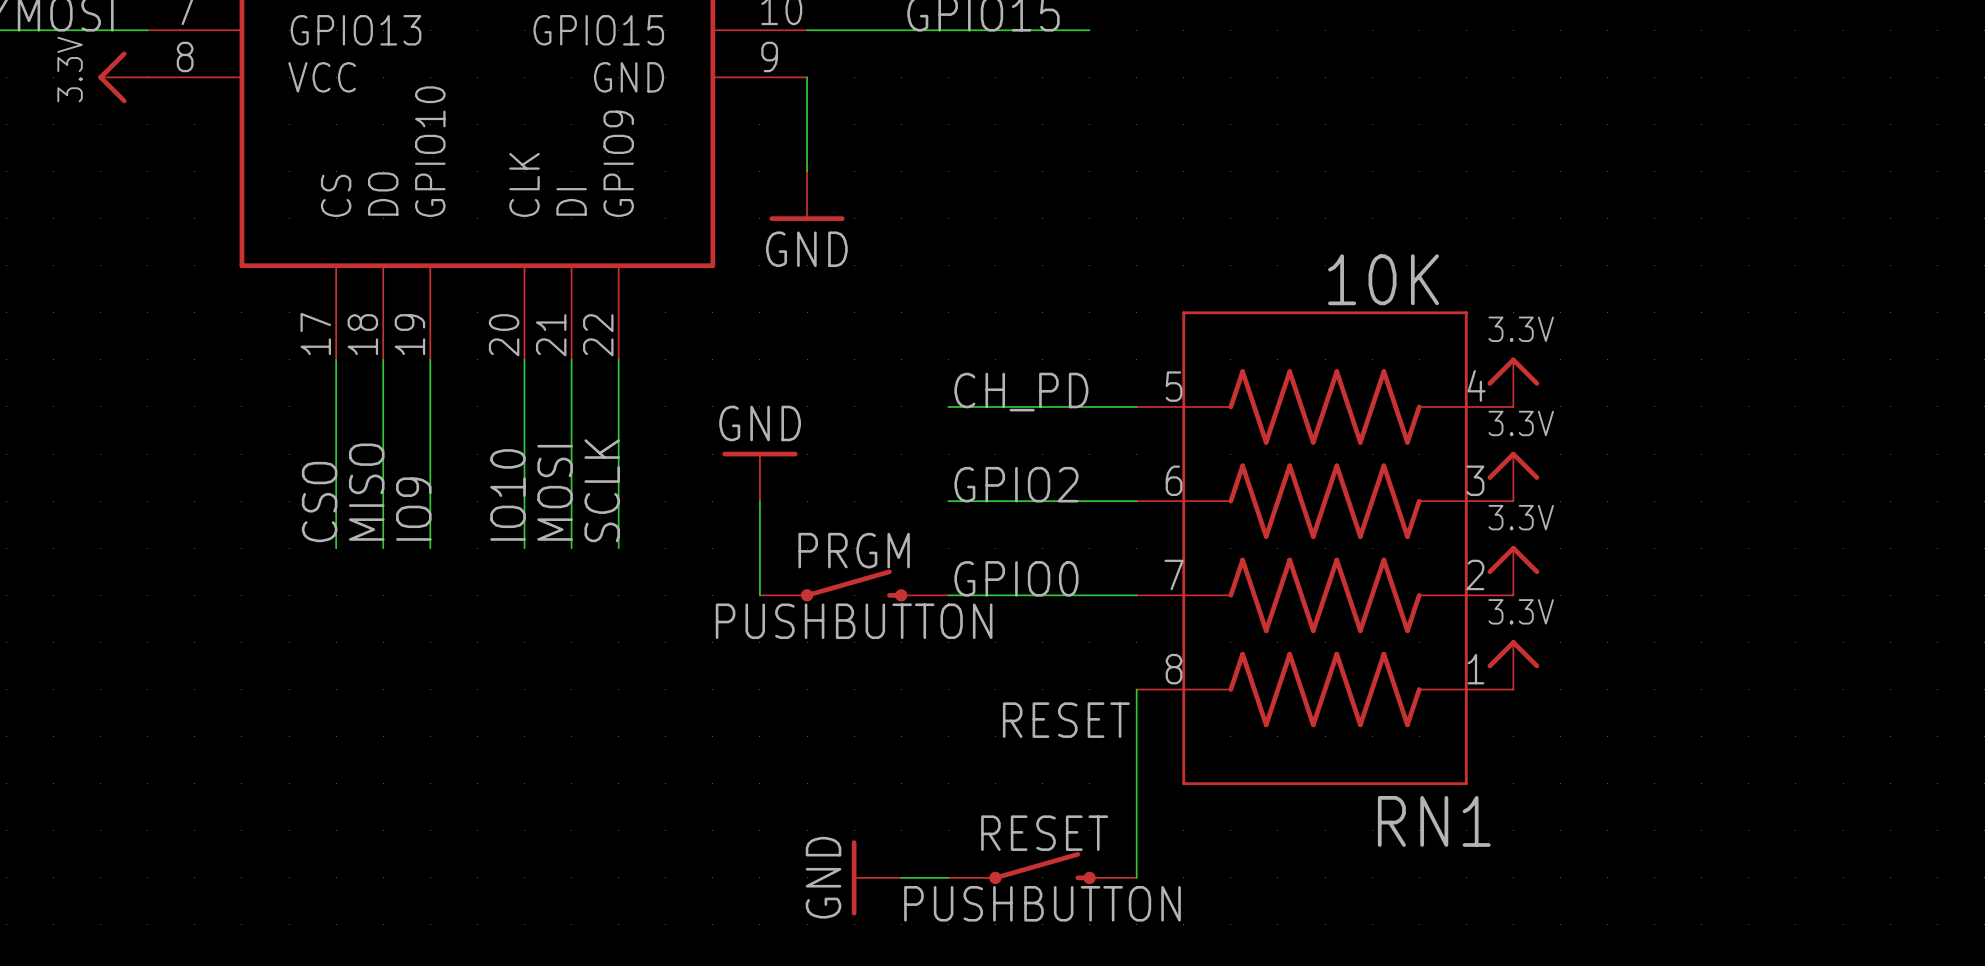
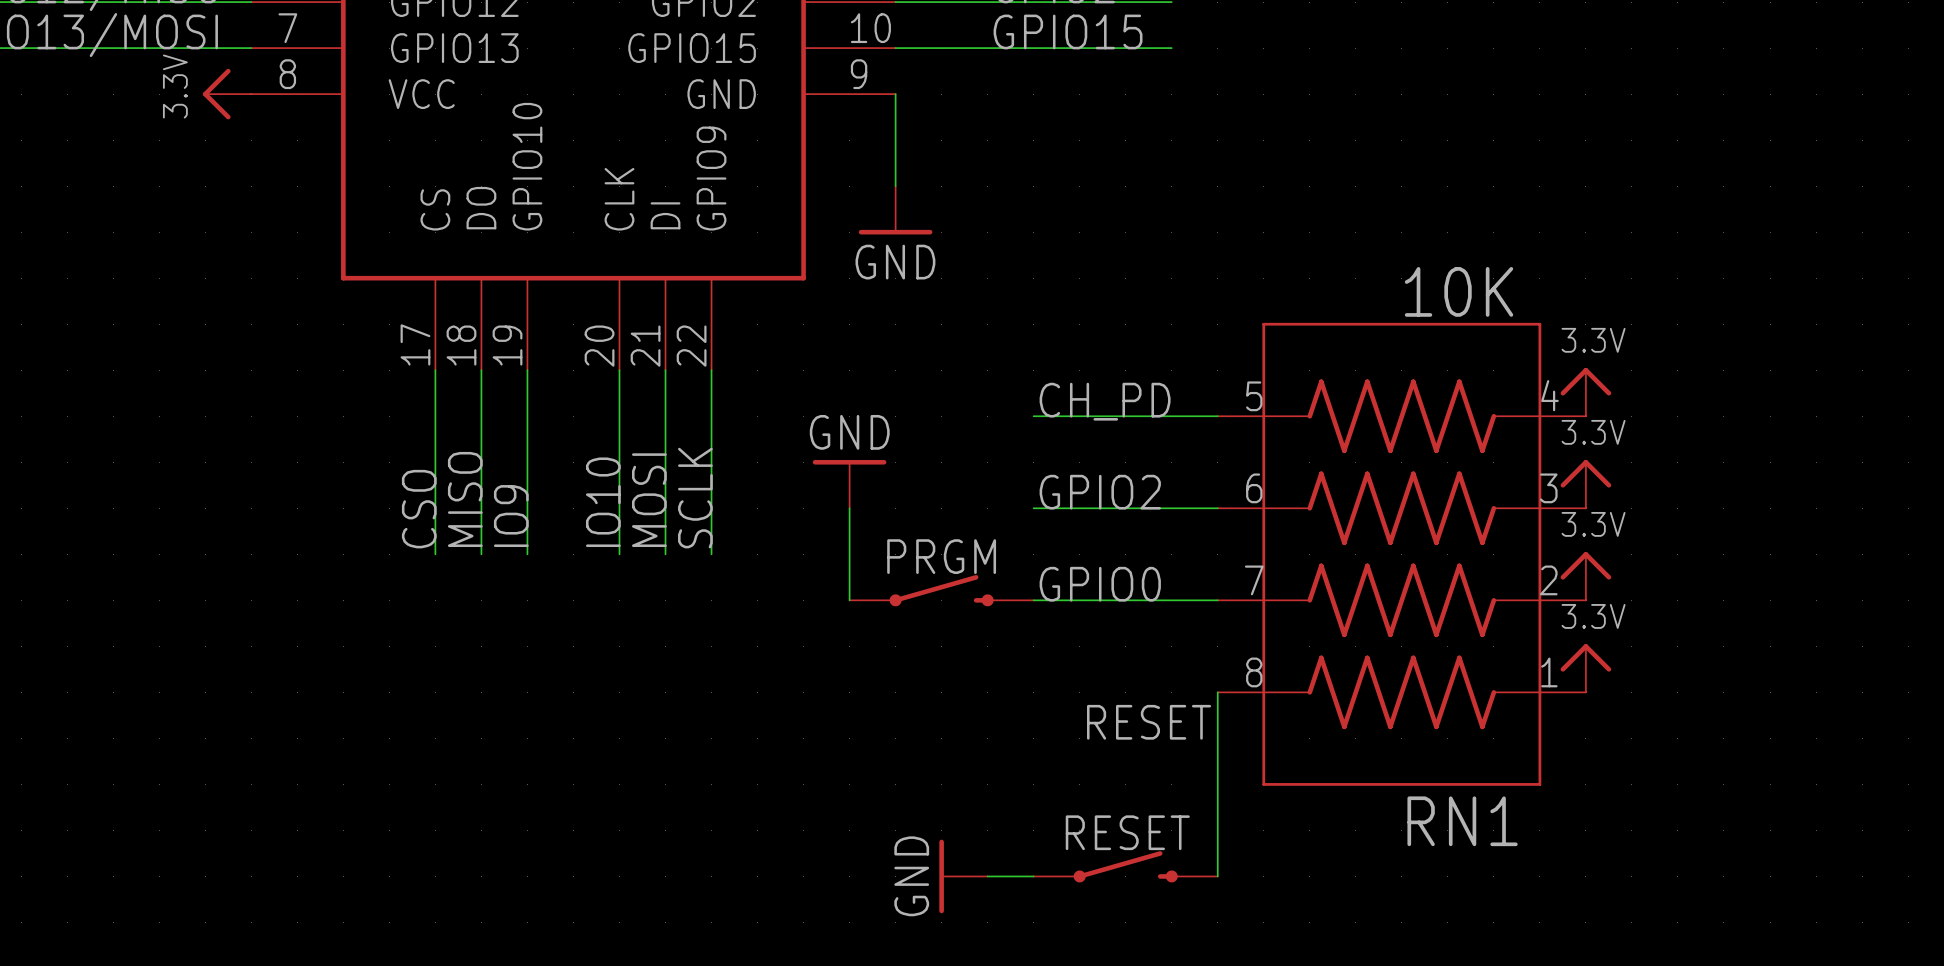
PRGM value: PUSHBUTTON (854, 621) -> none
RN1 name position: RN1 (1434, 821) -> RN1 (1462, 821)
RESET value: PUSHBUTTON (1042, 903) -> none

